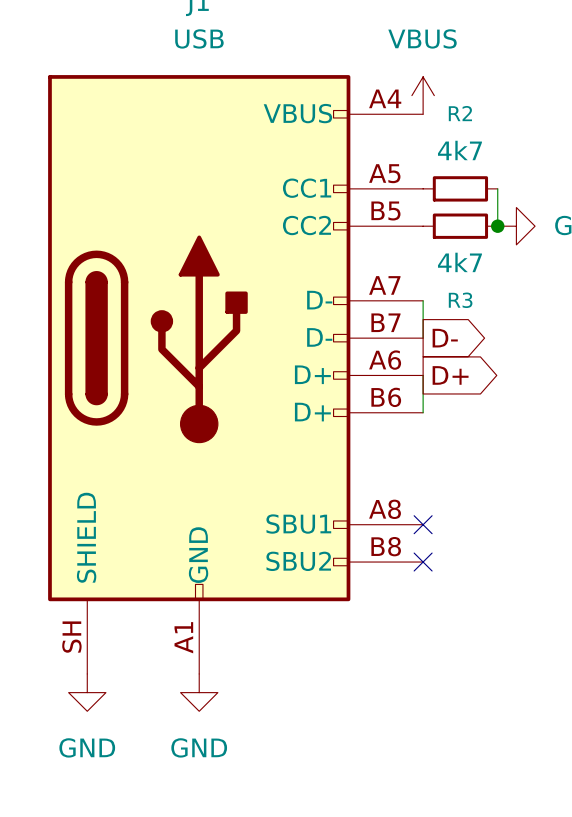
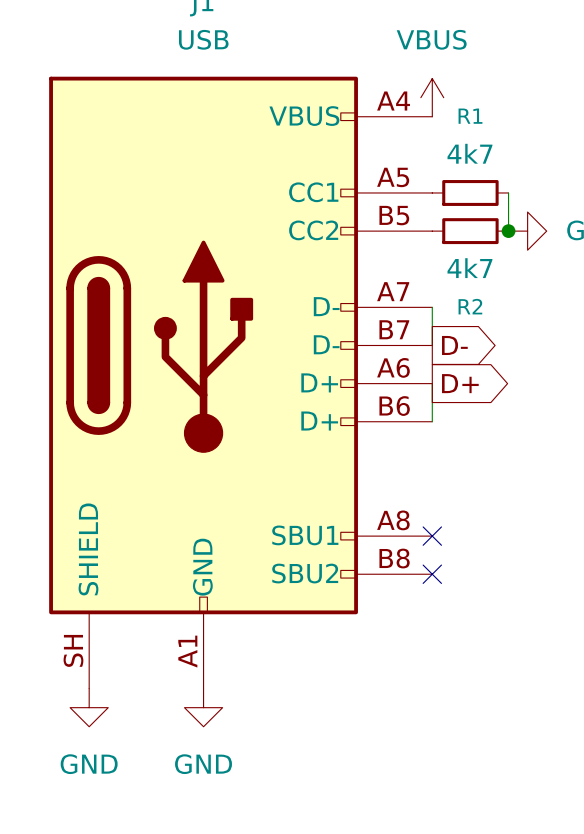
R2 name: R2 (460, 113) -> R1 (470, 116)
R3 name: R3 (460, 300) -> R2 (470, 306)

